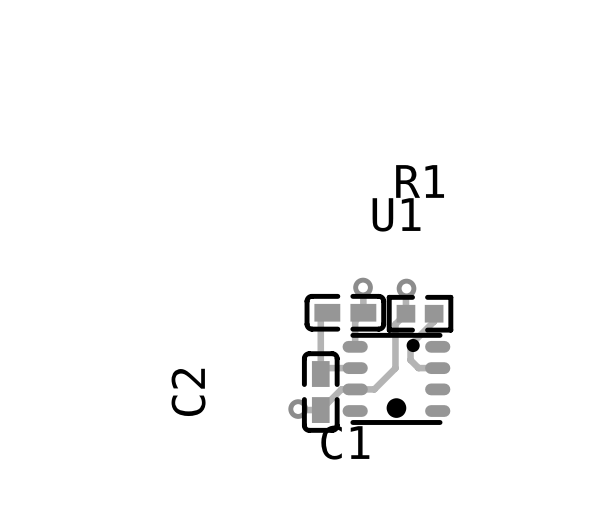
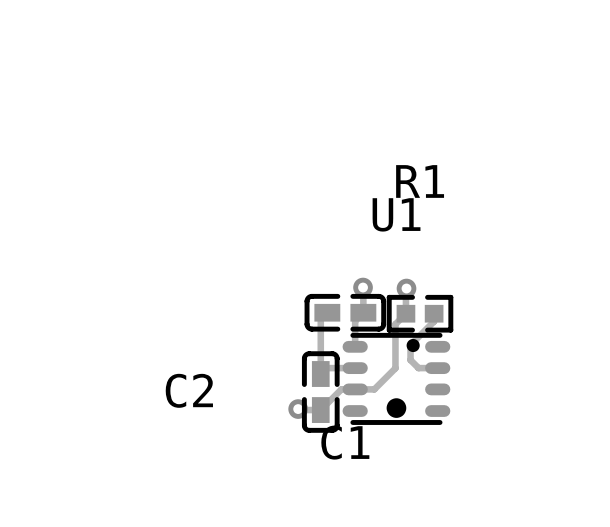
C2 name rotation: 0° (188, 392) -> 90° clockwise (189, 390)

